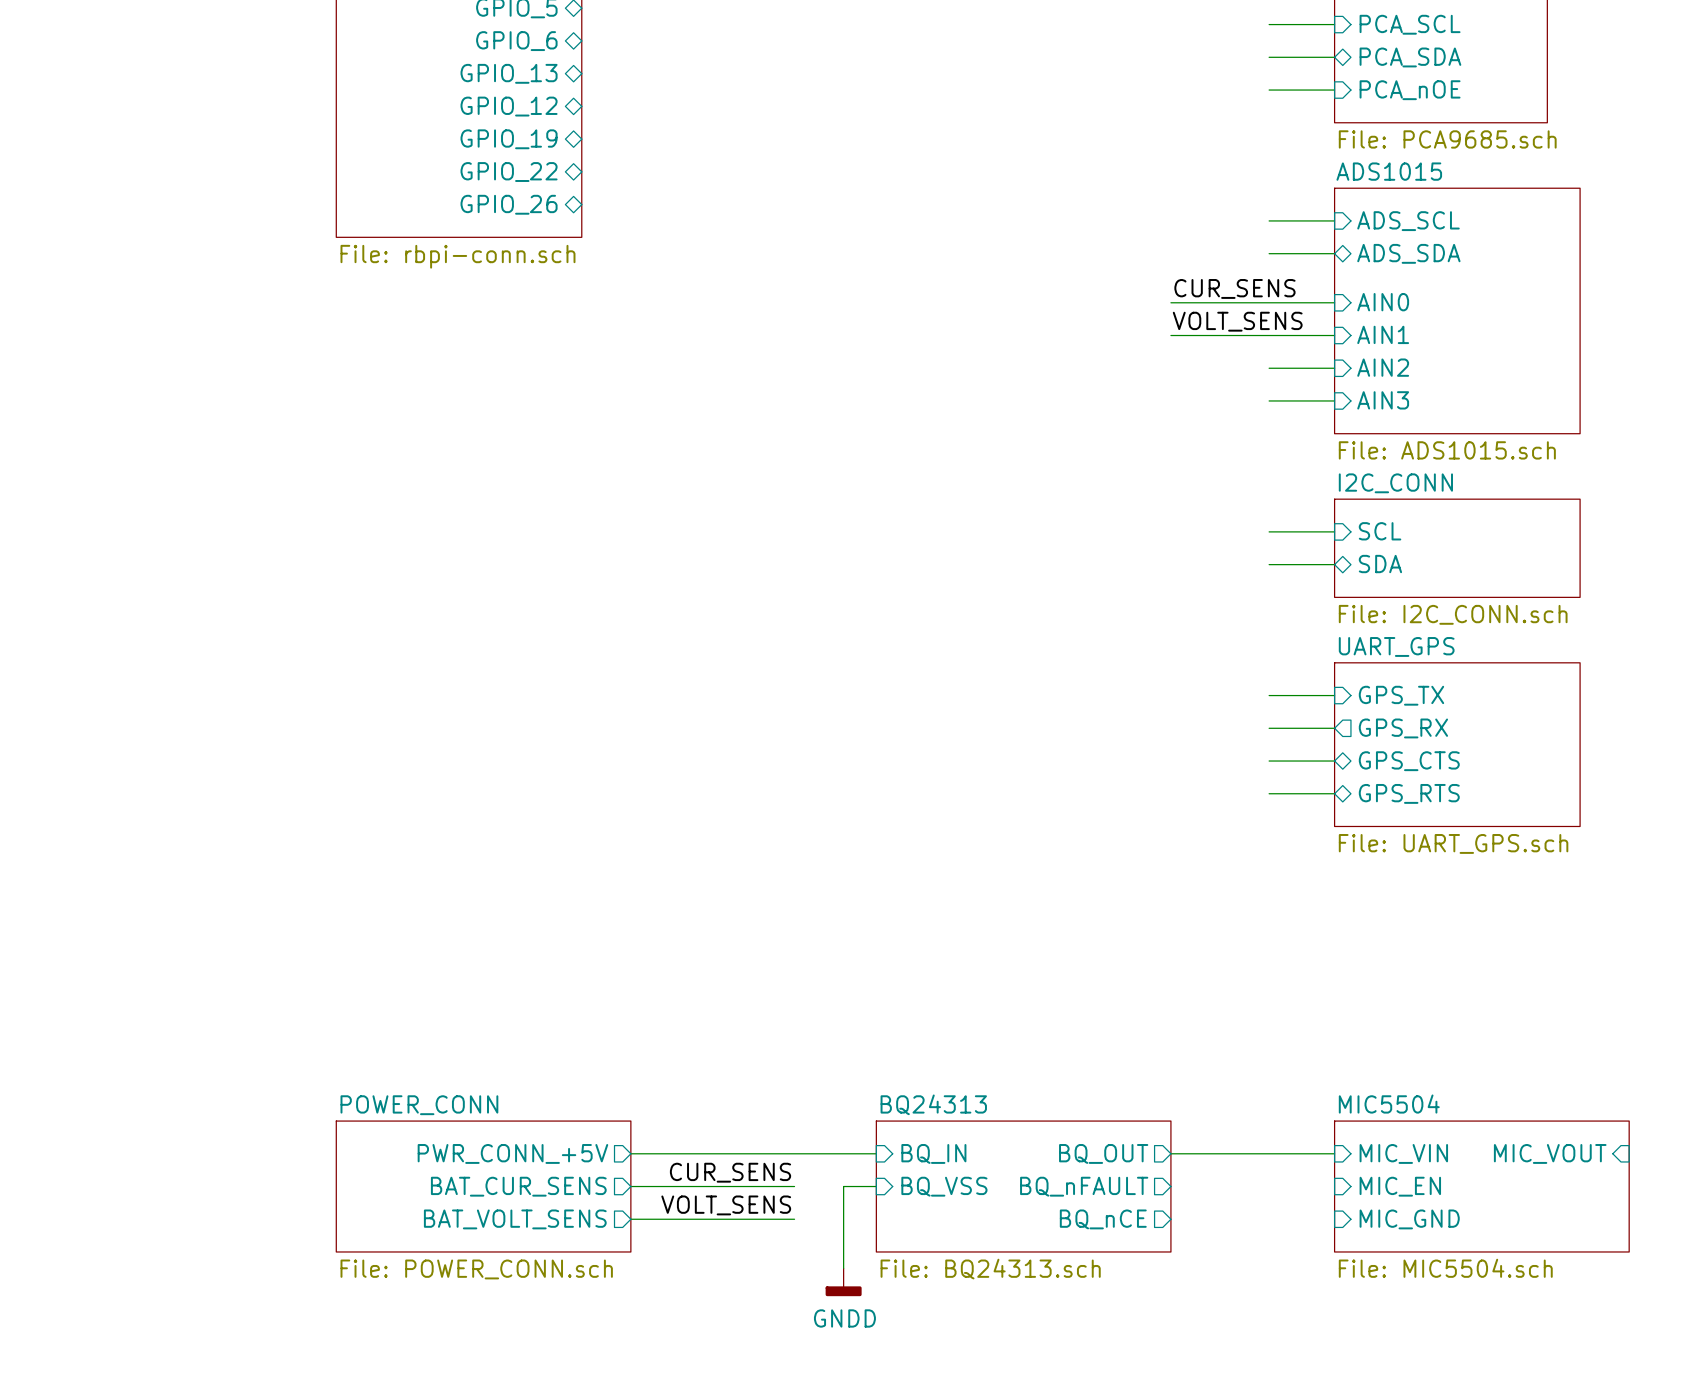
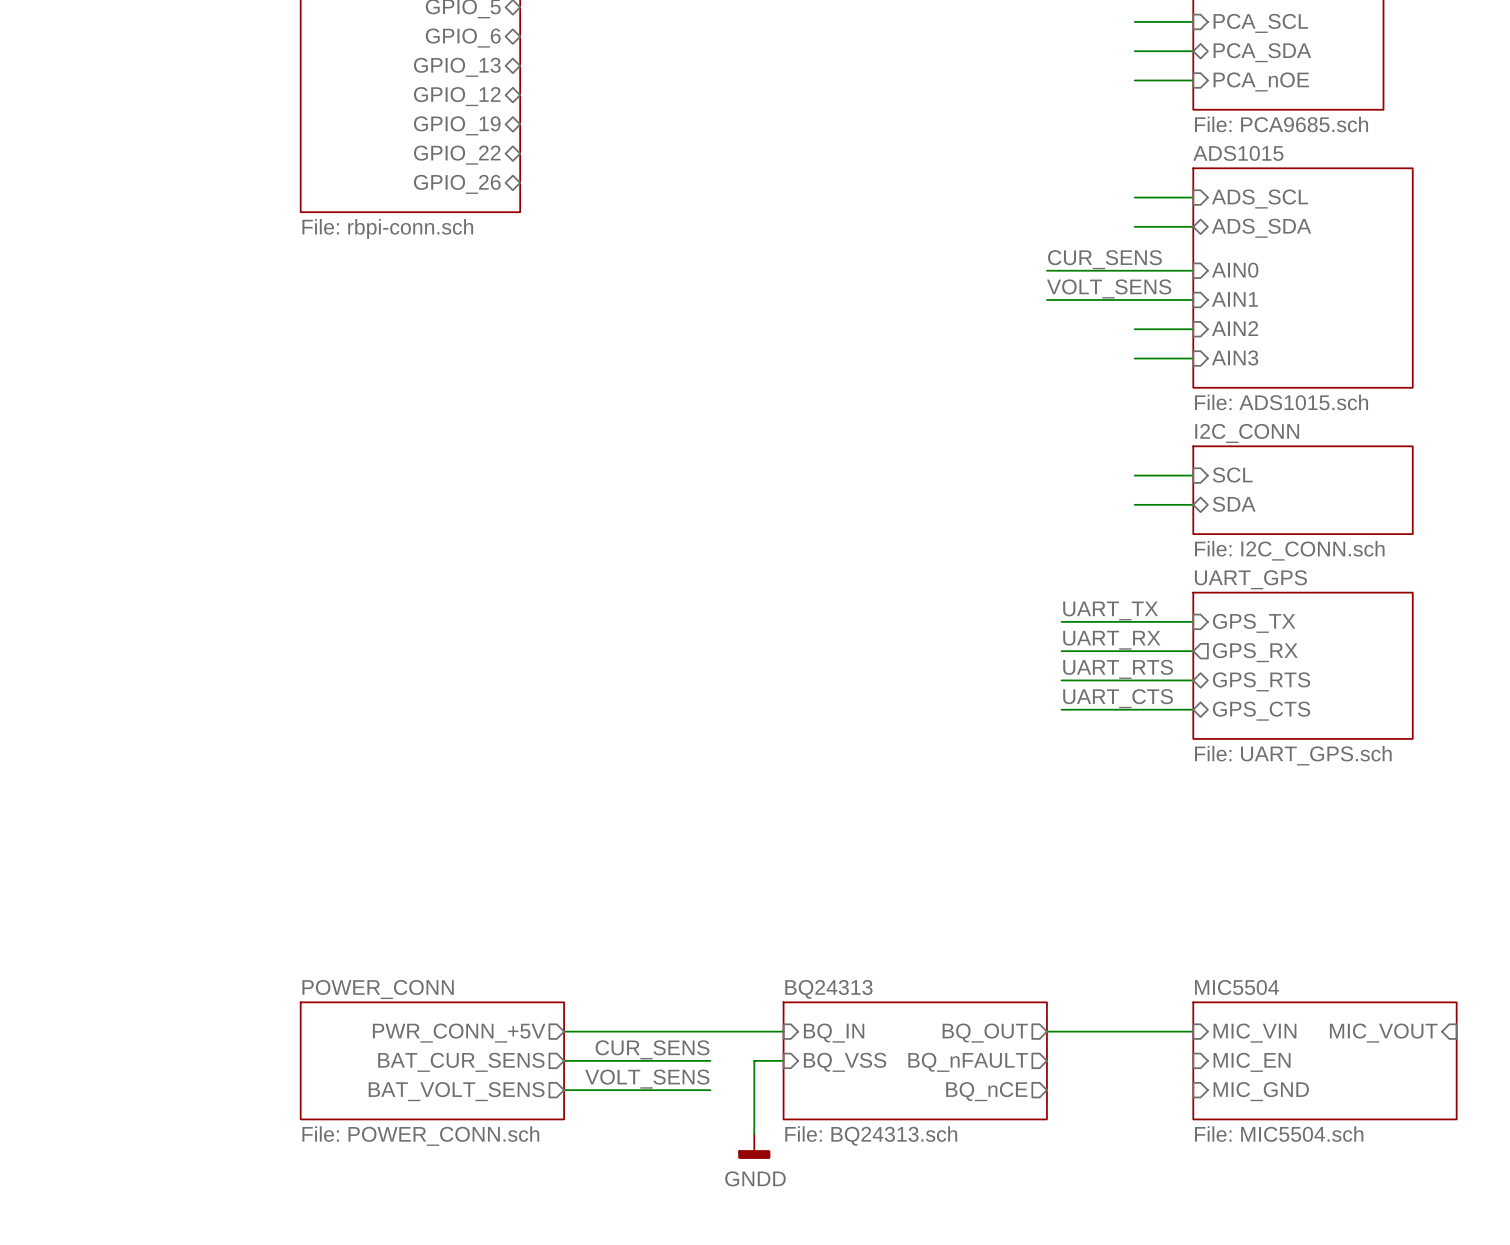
label: none -> UART_TX (1110, 610)
wire: none -> (1061, 621) (1134, 621)
label: none -> UART_RX (1111, 640)
wire: none -> (1061, 651) (1134, 651)
label: none -> UART_RTS (1118, 669)
wire: none -> (1061, 680) (1134, 680)
sheet pin: GPS_CTS (1409, 761) -> GPS_RTS (1261, 681)
label: none -> UART_CTS (1118, 698)
wire: none -> (1061, 709) (1134, 709)
sheet pin: GPS_RTS (1409, 793) -> GPS_CTS (1261, 711)

